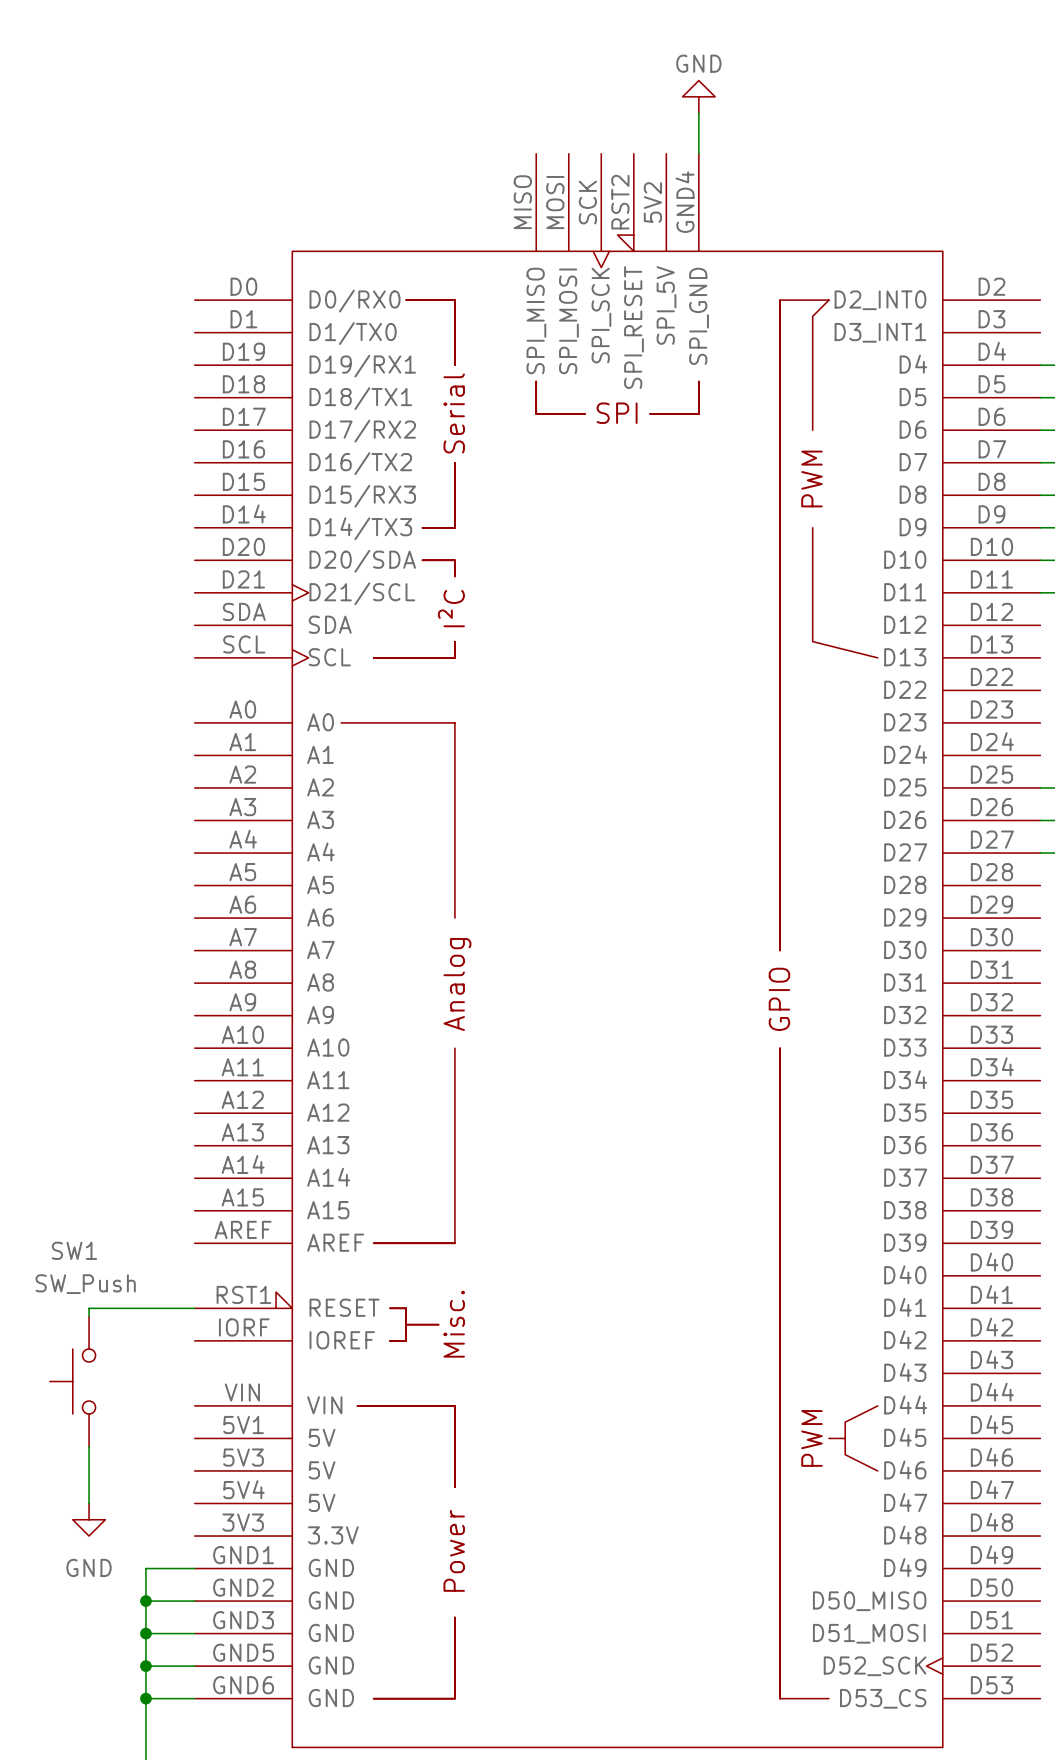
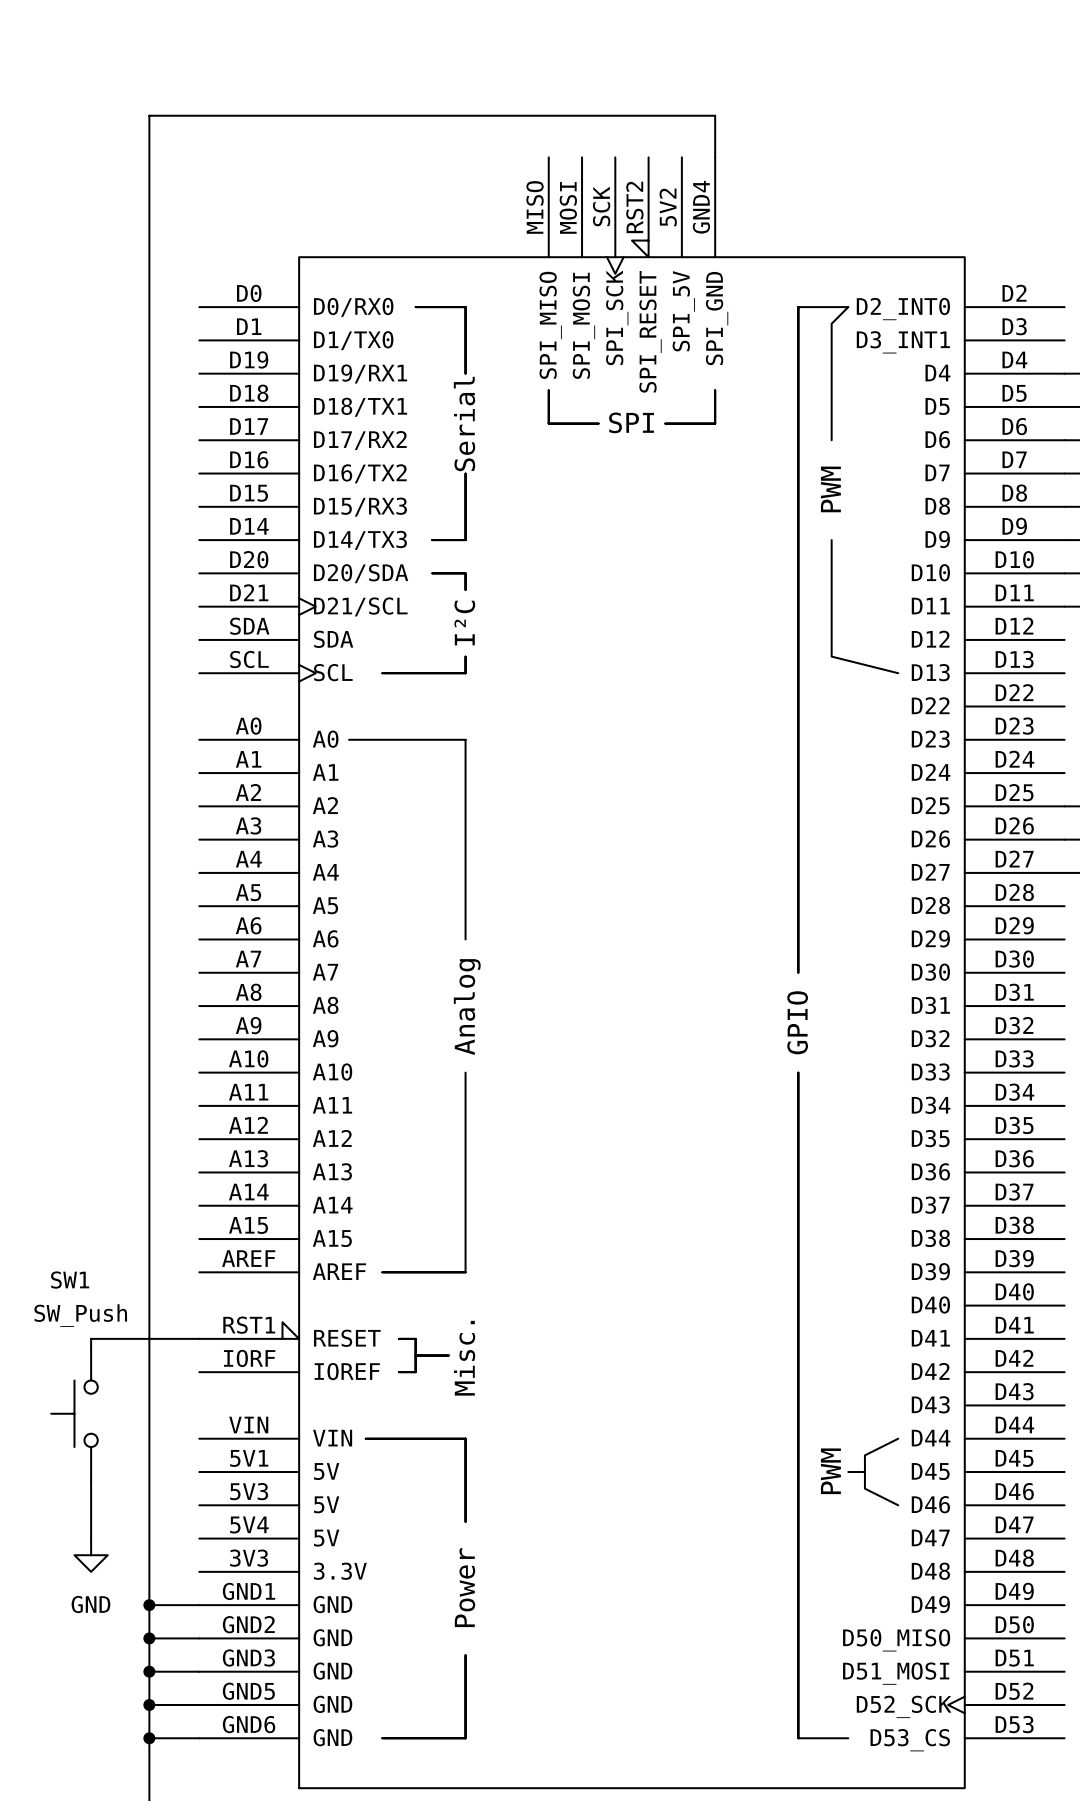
power symbol: GND (698, 96) -> none
wire: none -> (715, 115) (149, 115) (149, 1605)
junction: none -> (149, 1605)

